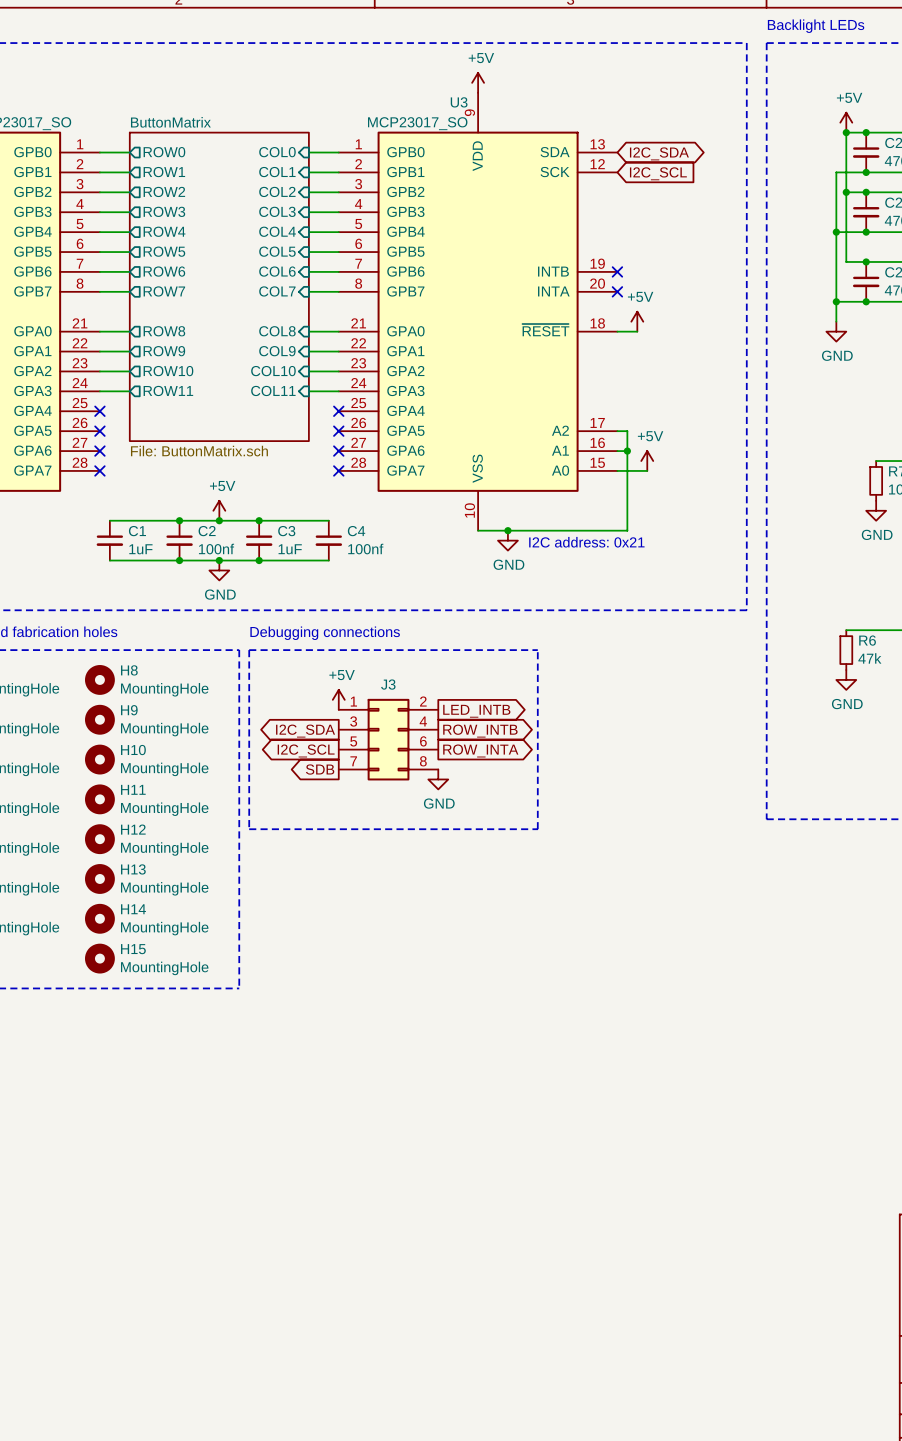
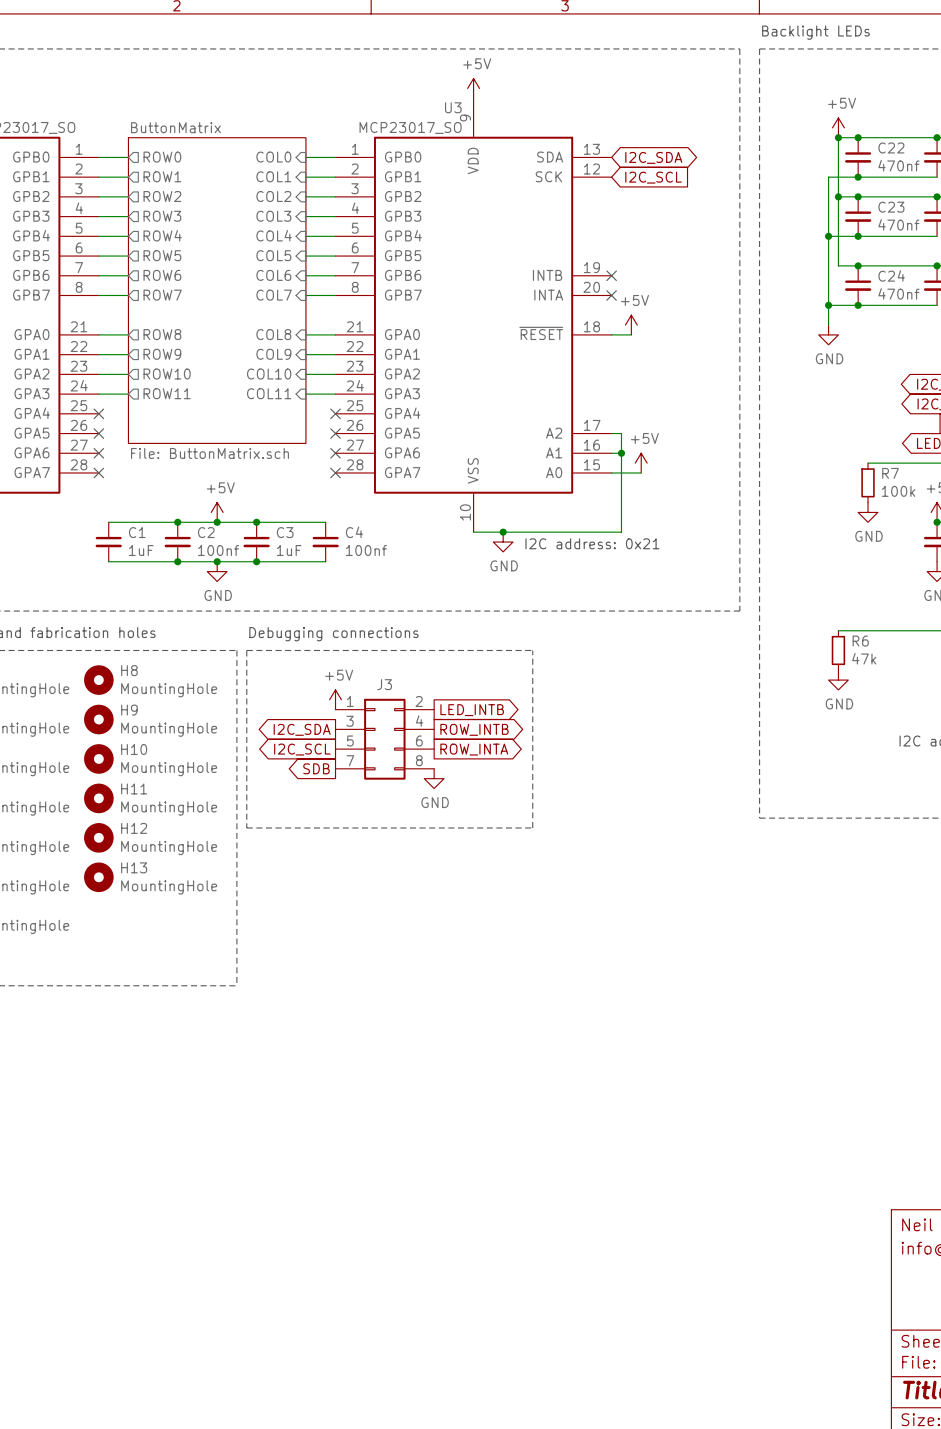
H14: MountingHole (99, 918) -> none
H15: MountingHole (99, 958) -> none

